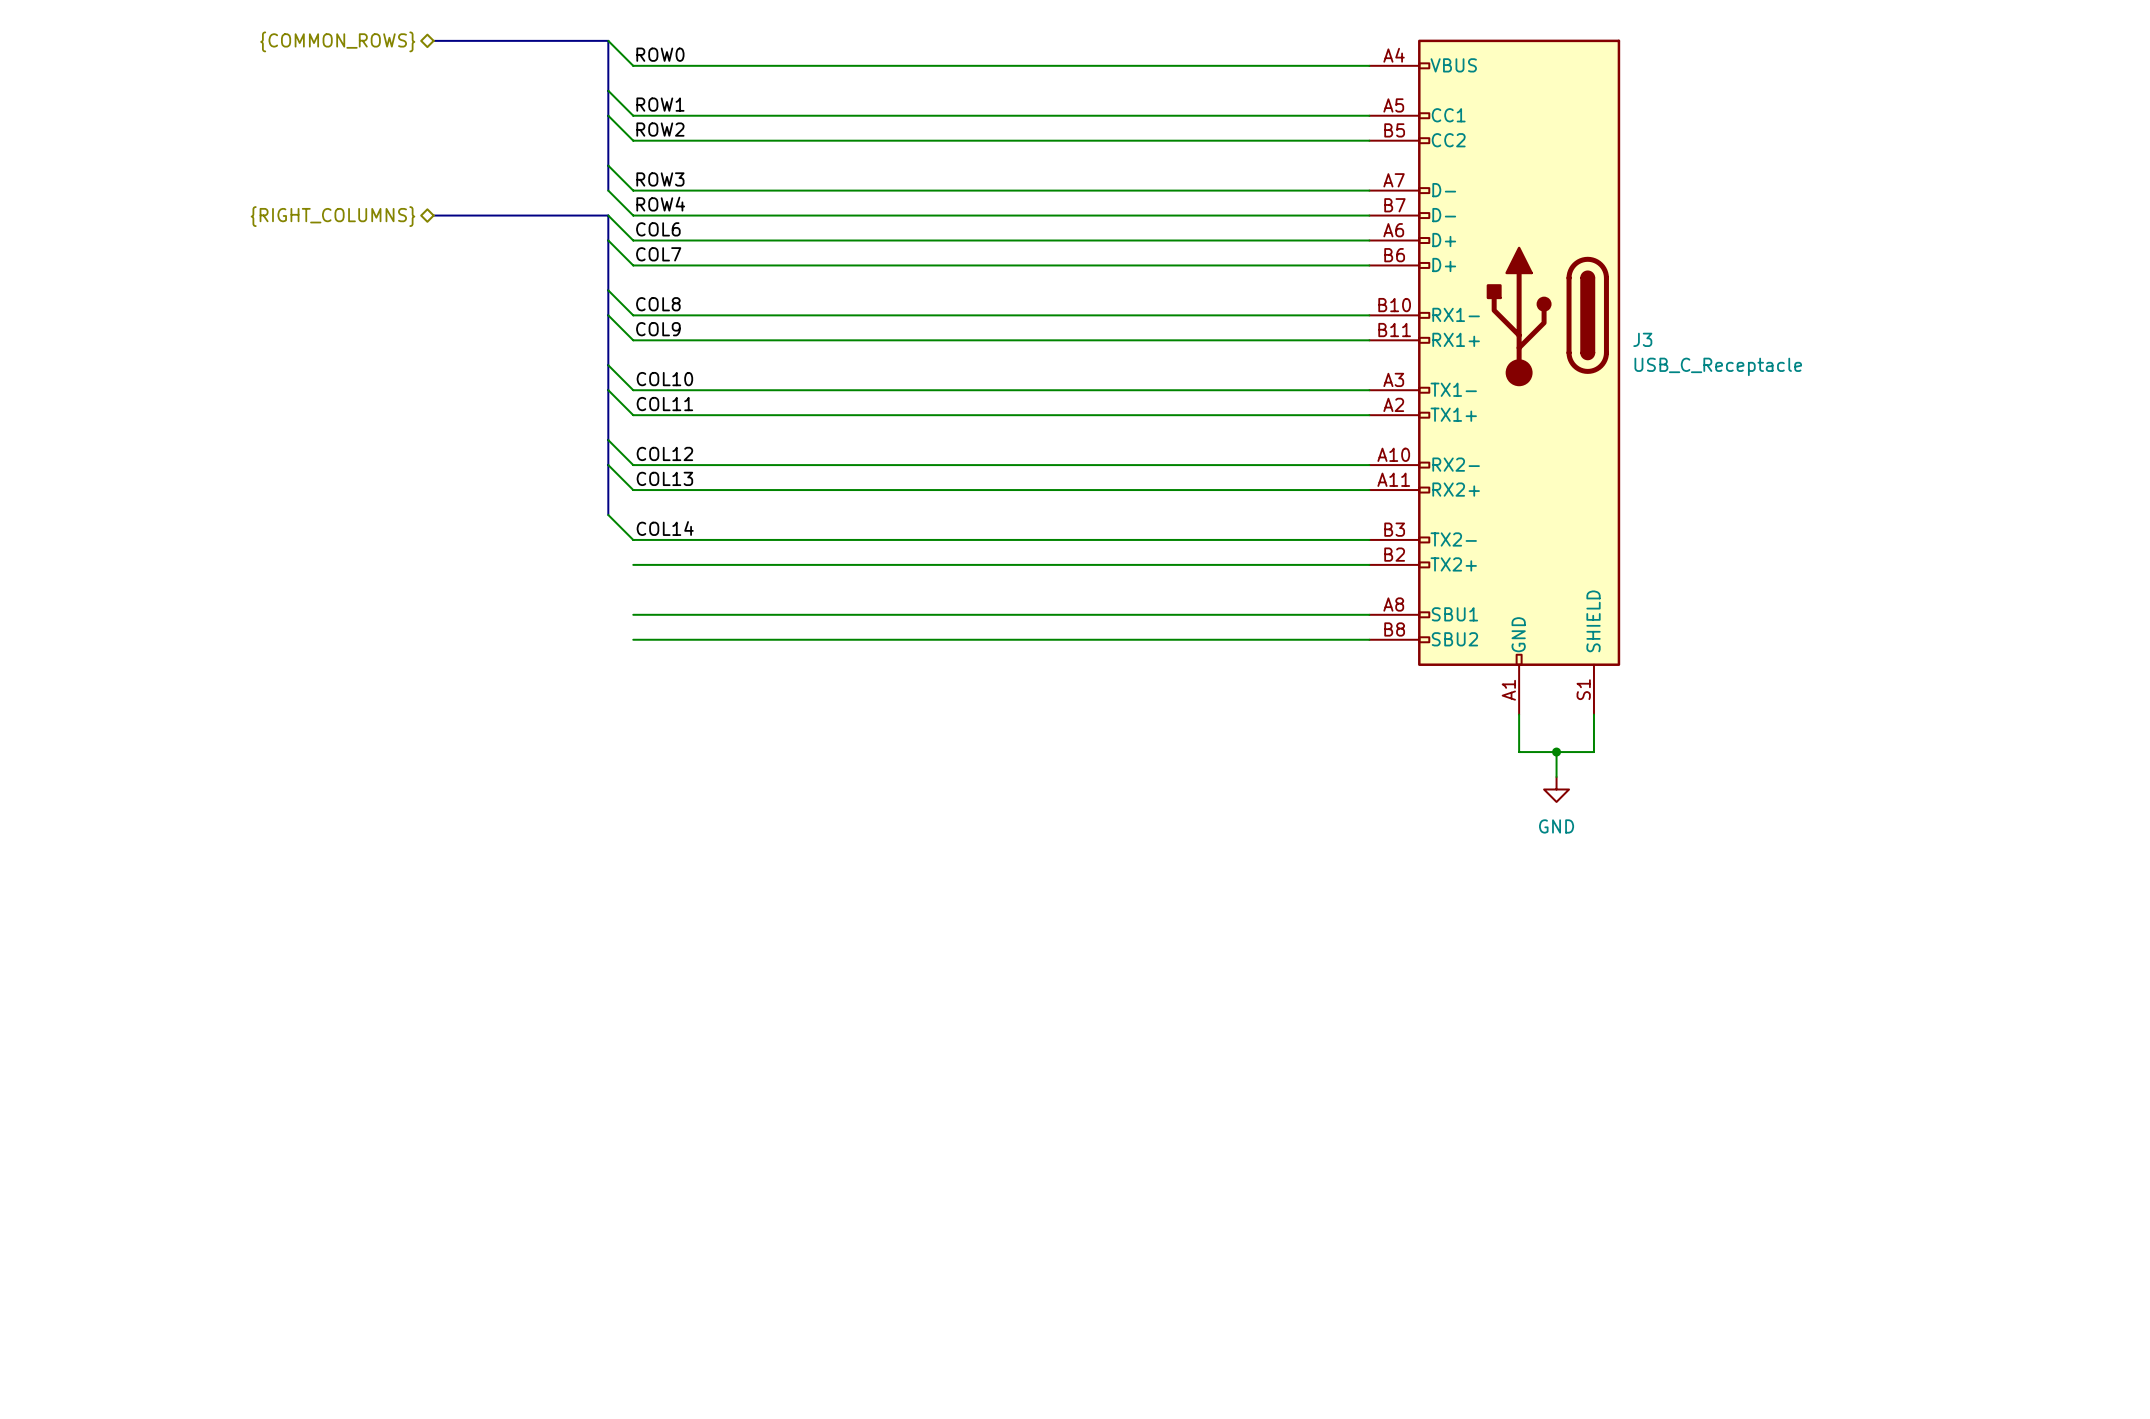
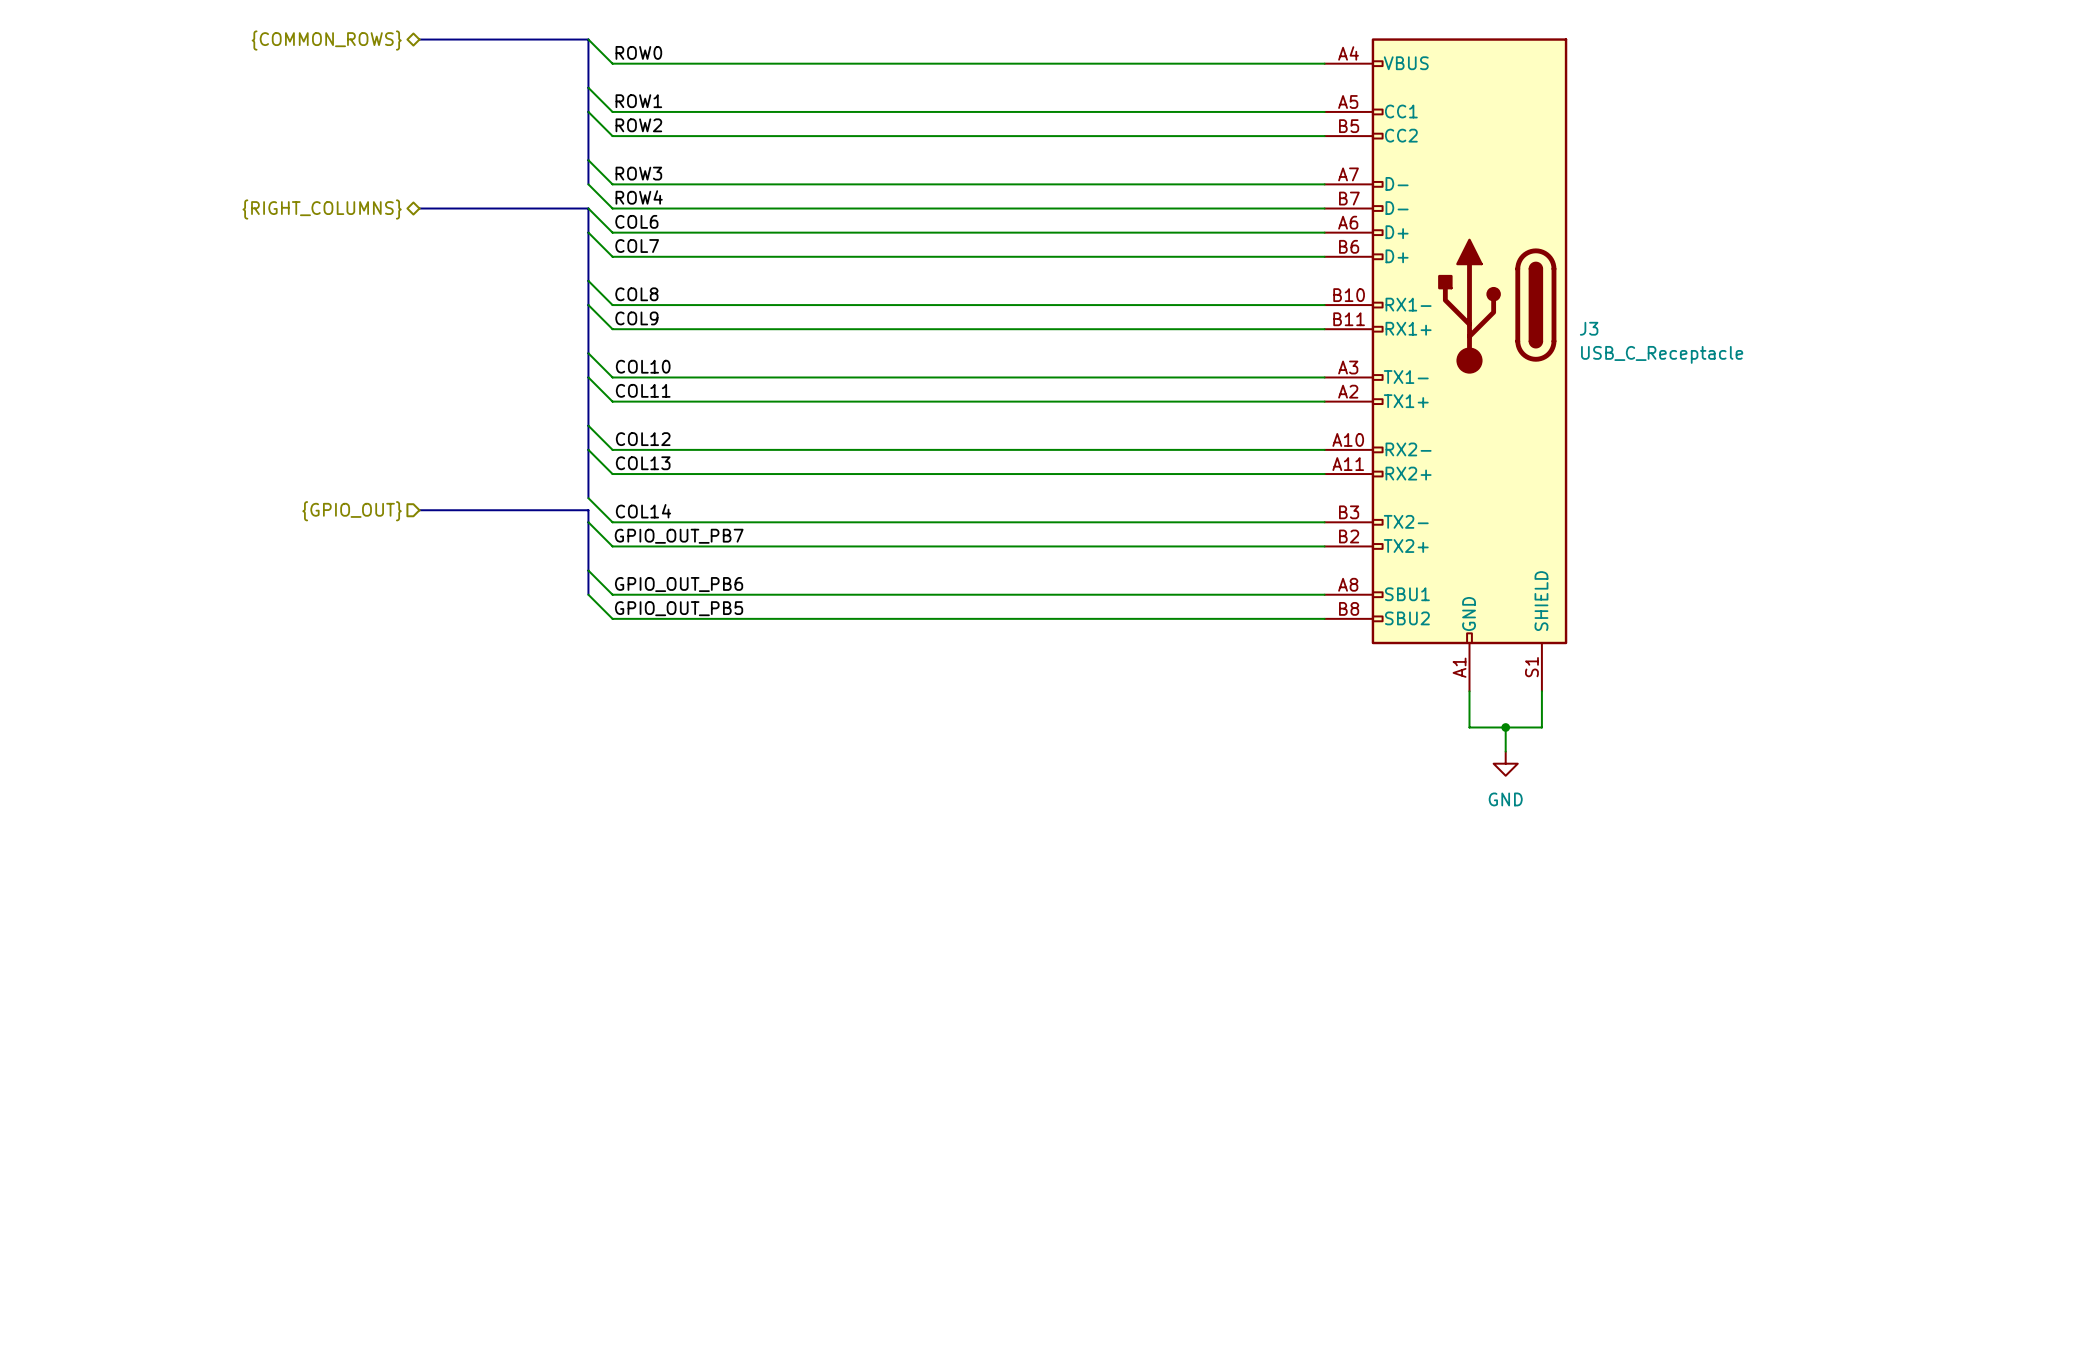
bus: none -> (419, 510) (588, 510) (588, 594)
hierarchical label: none -> {GPIO_OUT} (352, 511)
wire: none -> (588, 522) (612, 546)
label: none -> GPIO_OUT_PB7 (679, 536)
wire: none -> (588, 570) (612, 594)
label: none -> GPIO_OUT_PB6 (679, 584)
wire: none -> (588, 594) (612, 618)
label: none -> GPIO_OUT_PB5 (679, 608)

